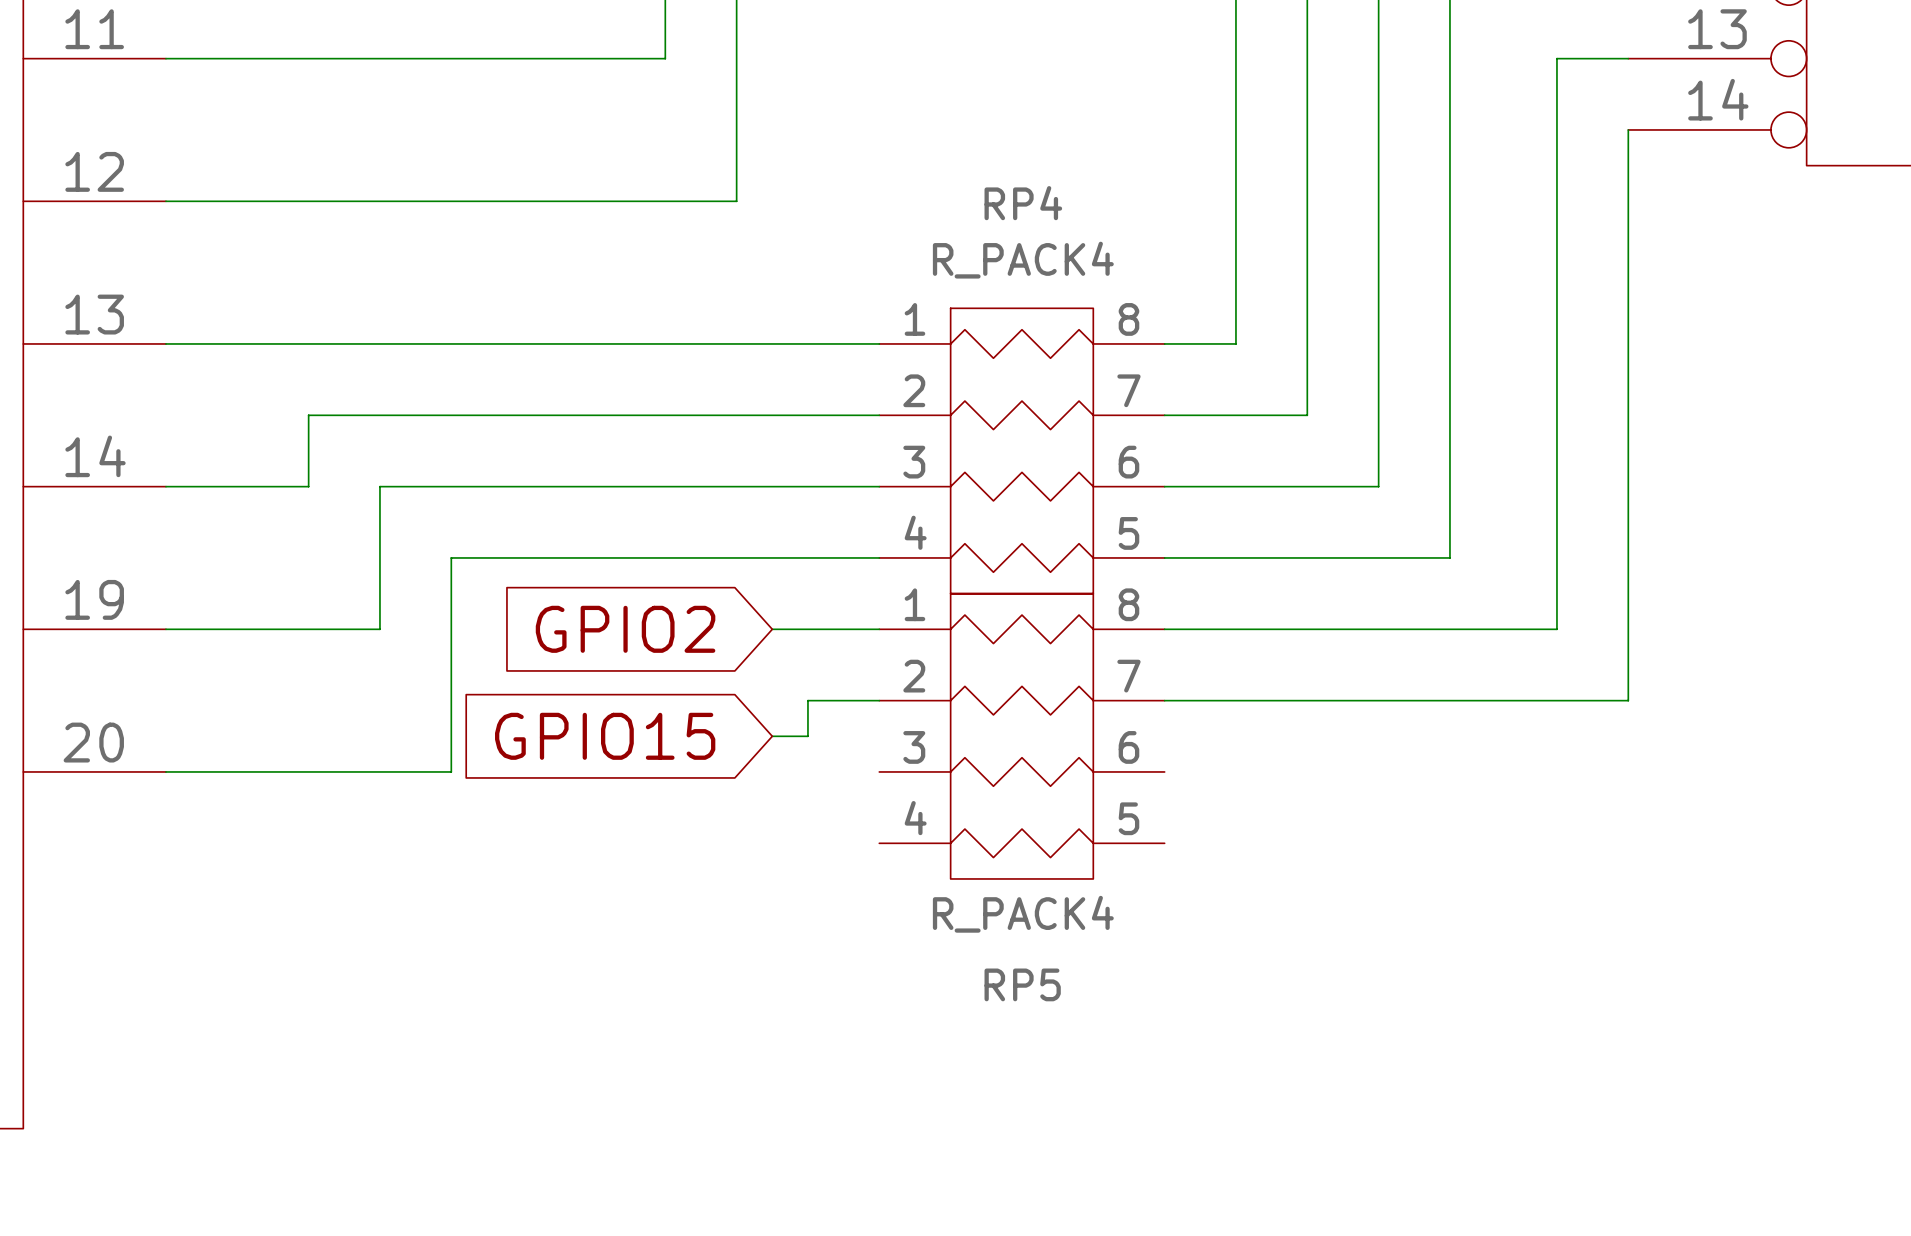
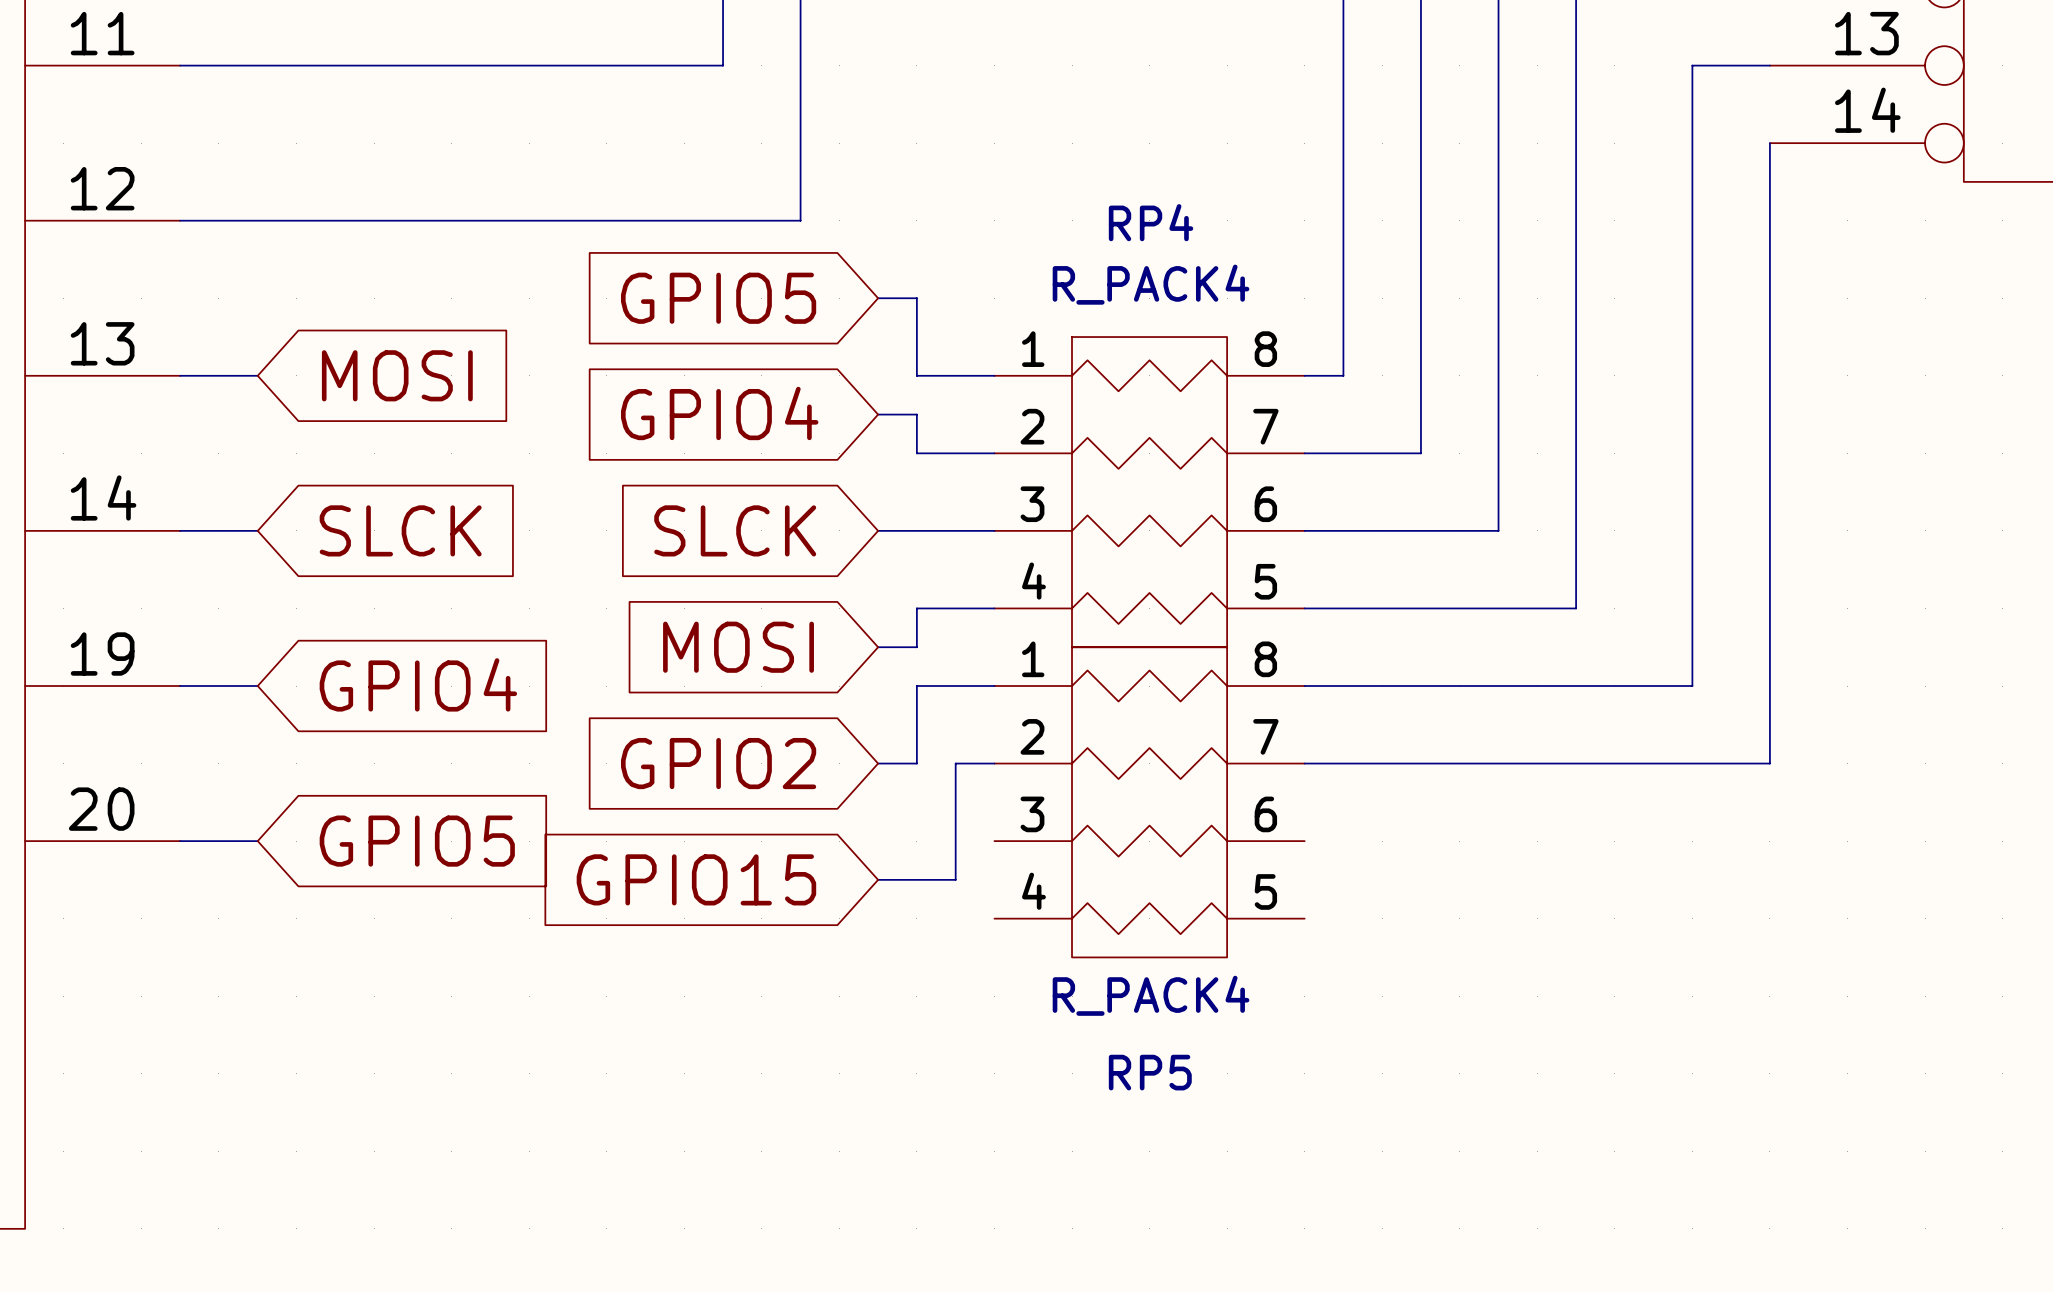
global label: none -> GPIO5 (718, 298)
wire: (237, 343) (843, 343) -> (878, 298) (916, 298) (916, 375)
global label: none -> MOSI (397, 375)
global label: none -> GPIO4 (719, 413)
wire: (843, 415) (308, 415) (308, 486) (237, 486) -> (916, 453) (916, 414) (878, 414)
RP4 position: (1021, 450) -> (1149, 492)
global label: none -> SLCK (400, 530)
global label: none -> SLCK (735, 530)
wire: (807, 486) (379, 486) (379, 629) (237, 629) -> none
wire: (843, 557) (451, 557) (451, 771) (237, 771) -> (916, 608) (916, 647) (878, 647)
global label: none -> MOSI (738, 647)
global label: none -> GPIO4 (418, 684)
global label position: GPIO2 (625, 629) -> GPIO2 (718, 763)
wire: (772, 629) (843, 629) -> none
wire: (807, 700) (807, 736) (772, 736) -> none
wire: (843, 700) (879, 700) -> (916, 763) (916, 686)
wire: none -> (994, 763) (955, 763) (955, 879) (878, 879)
global label position: GPIO15 (605, 736) -> GPIO15 (696, 879)
RP5 position: (1021, 736) -> (1149, 802)
global label: none -> GPIO5 (417, 841)

